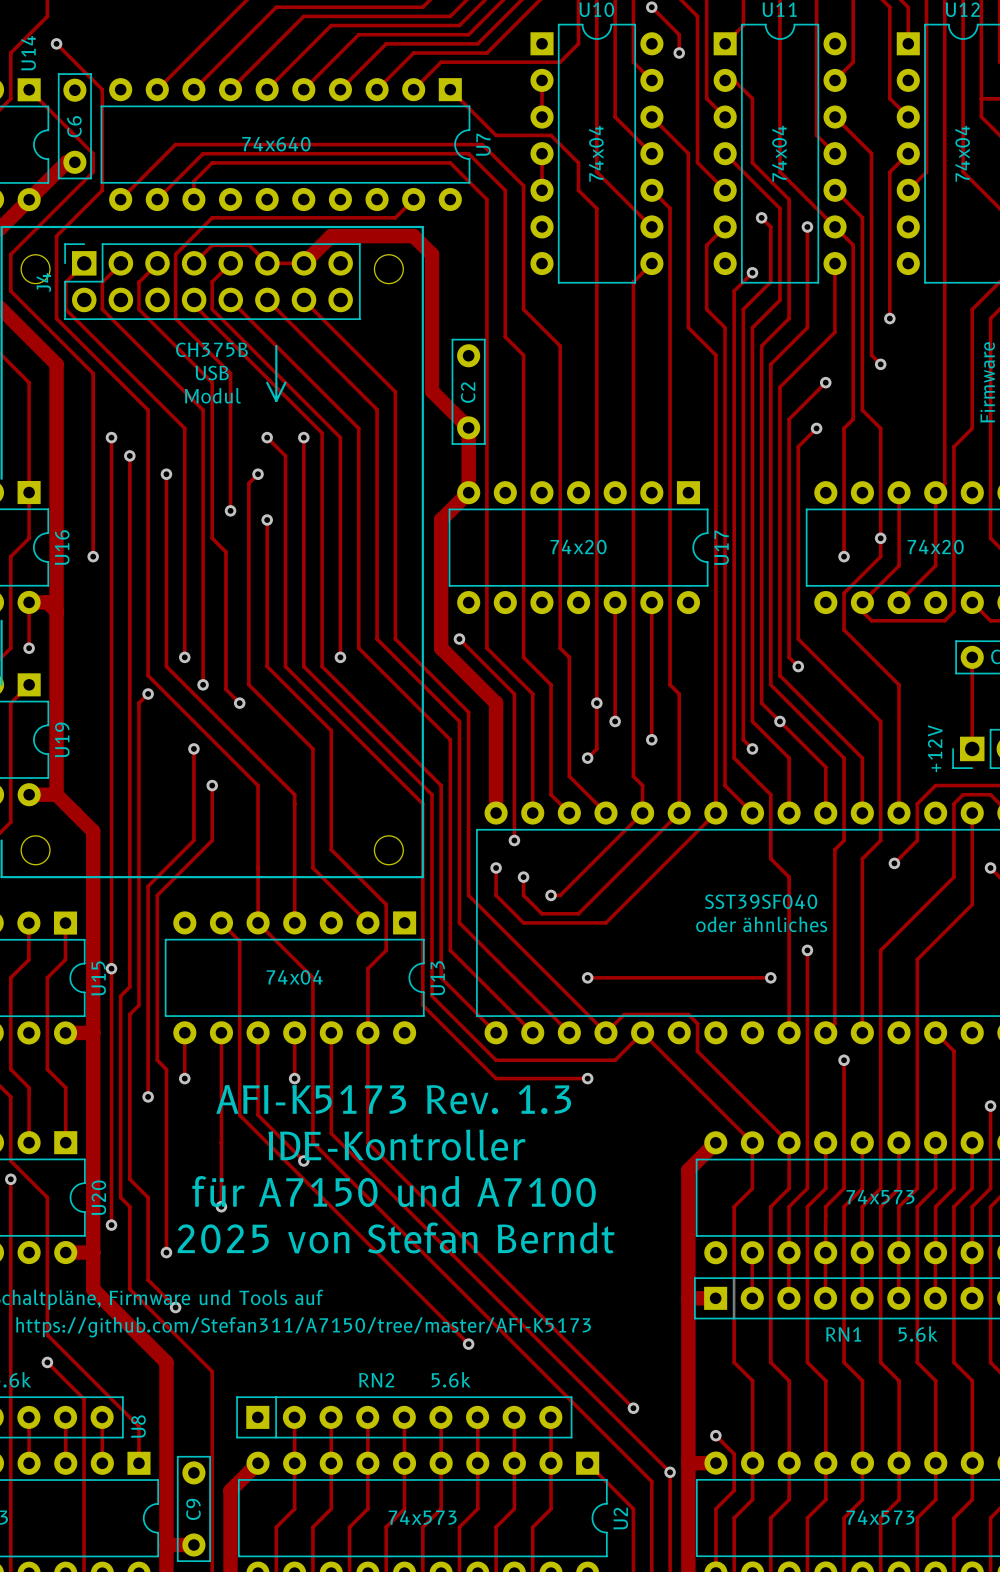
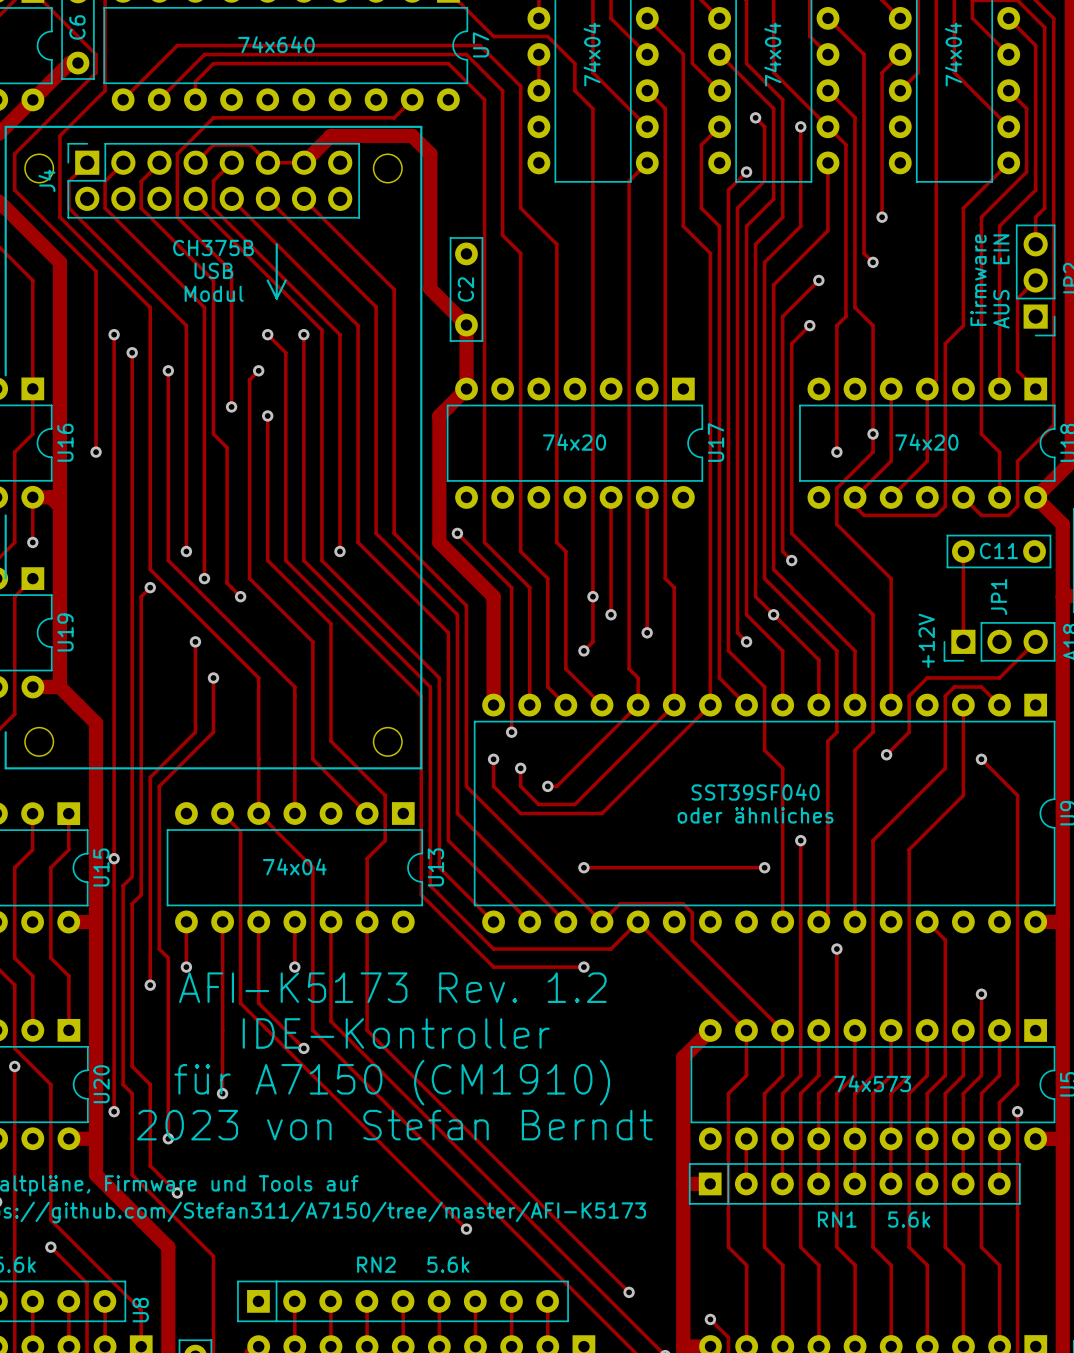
text: AFI-K5173 Rev. 1.3 (393, 1099) -> AFI-K5173 Rev. 1.2 (392, 987)
text: für A7150 und A7100 (394, 1191) -> für A7150 (CM1910) (392, 1082)
text: 2025 von Stefan Berndt (396, 1237) -> 2023 von Stefan Berndt (394, 1125)

